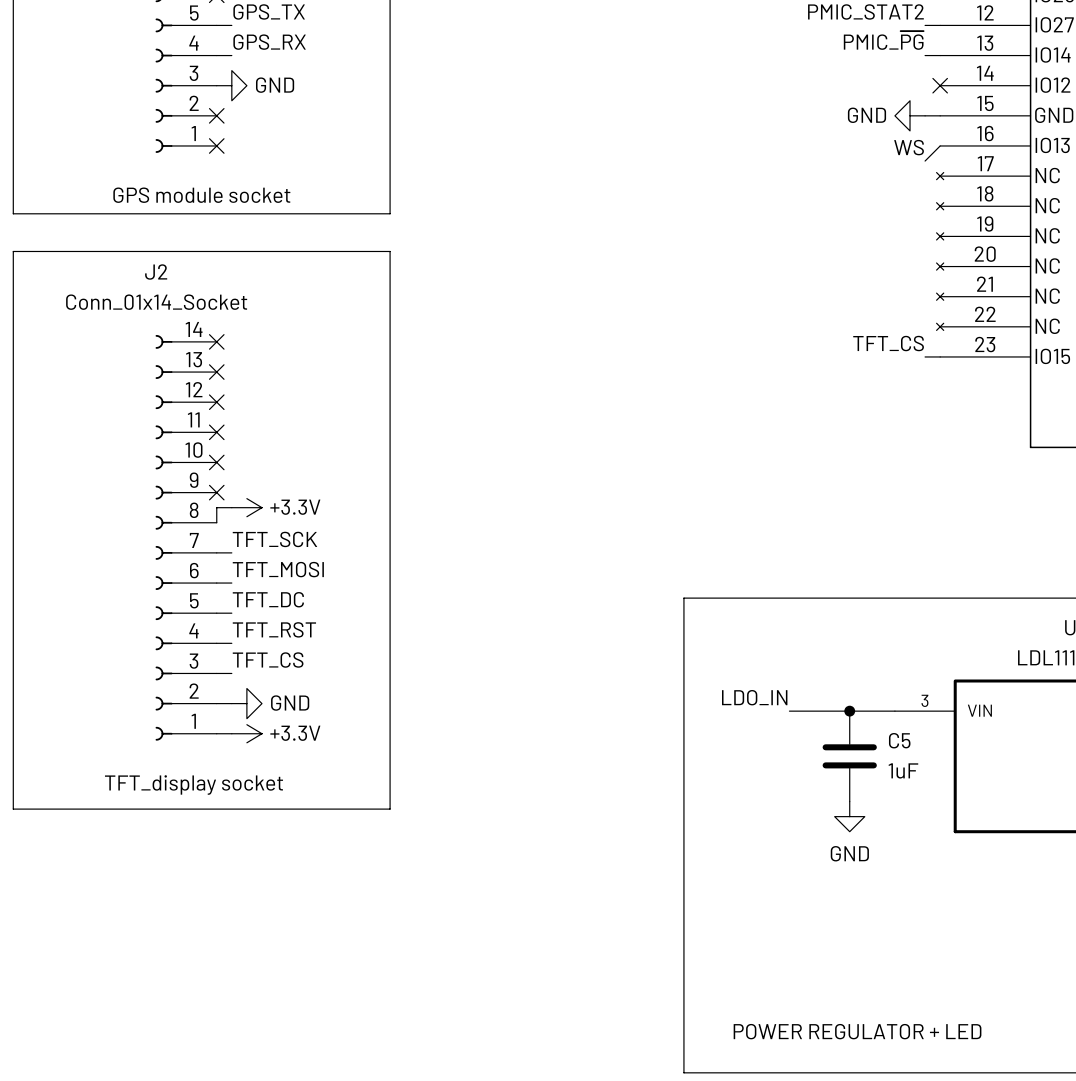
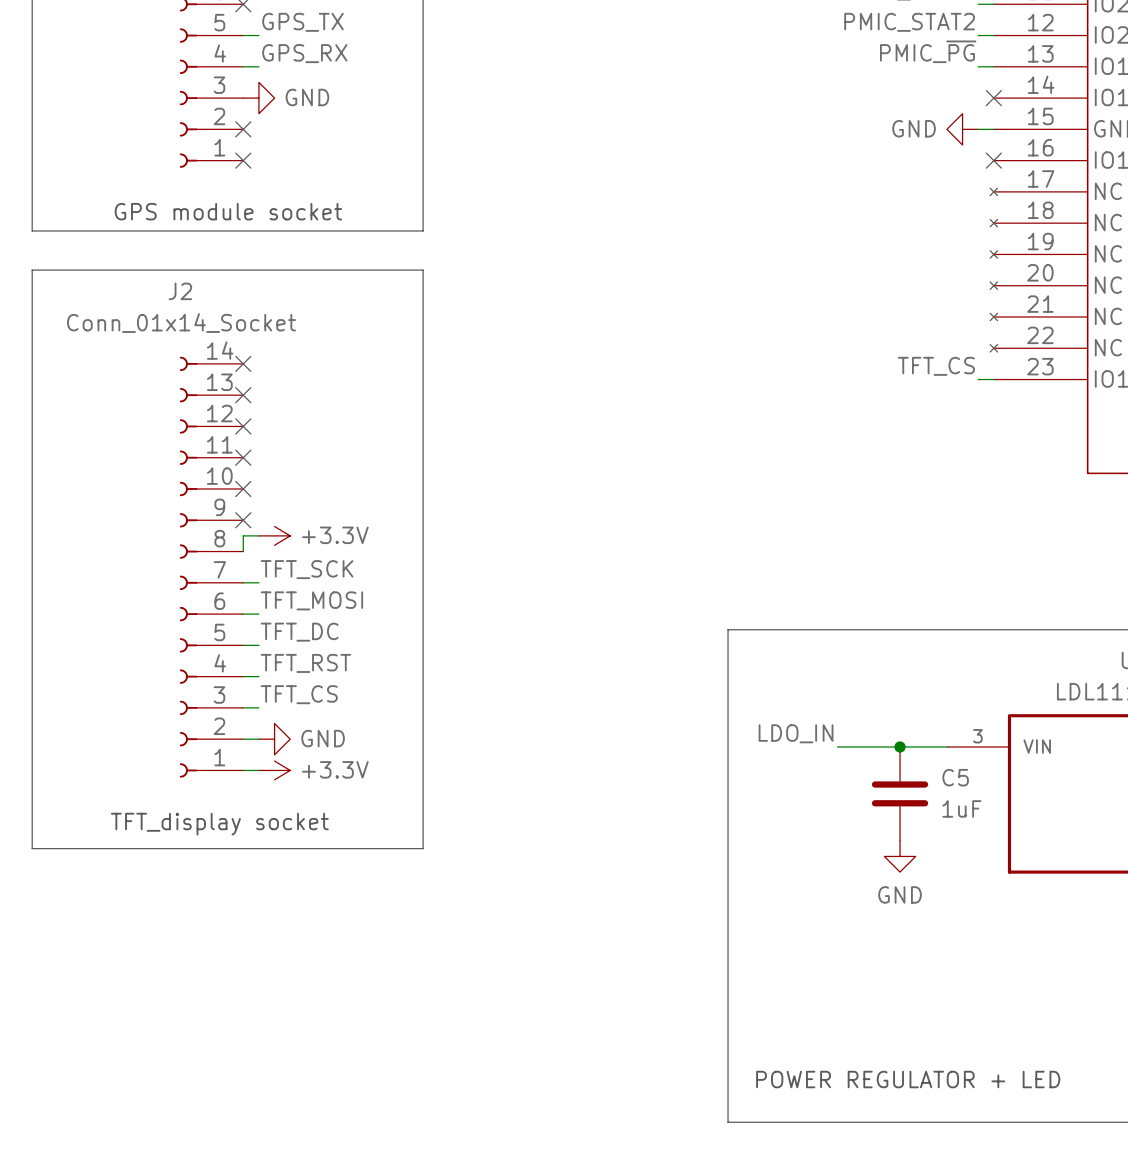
wire: (940, 145) (925, 161) -> none
no-connect mark: none -> (993, 160)
label: WS (909, 147) -> none

